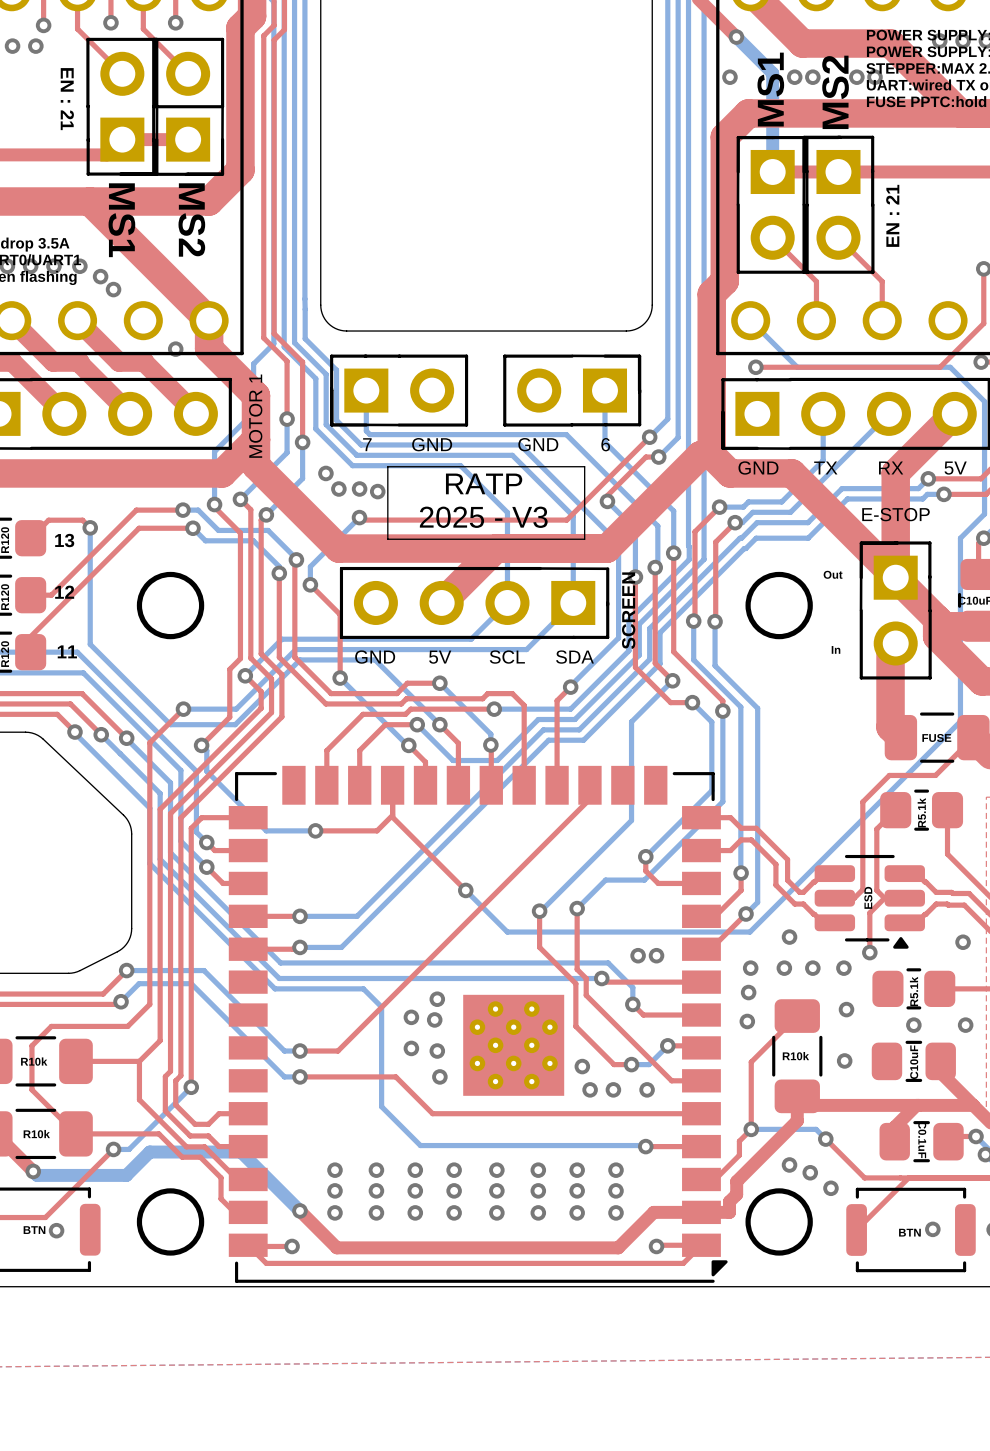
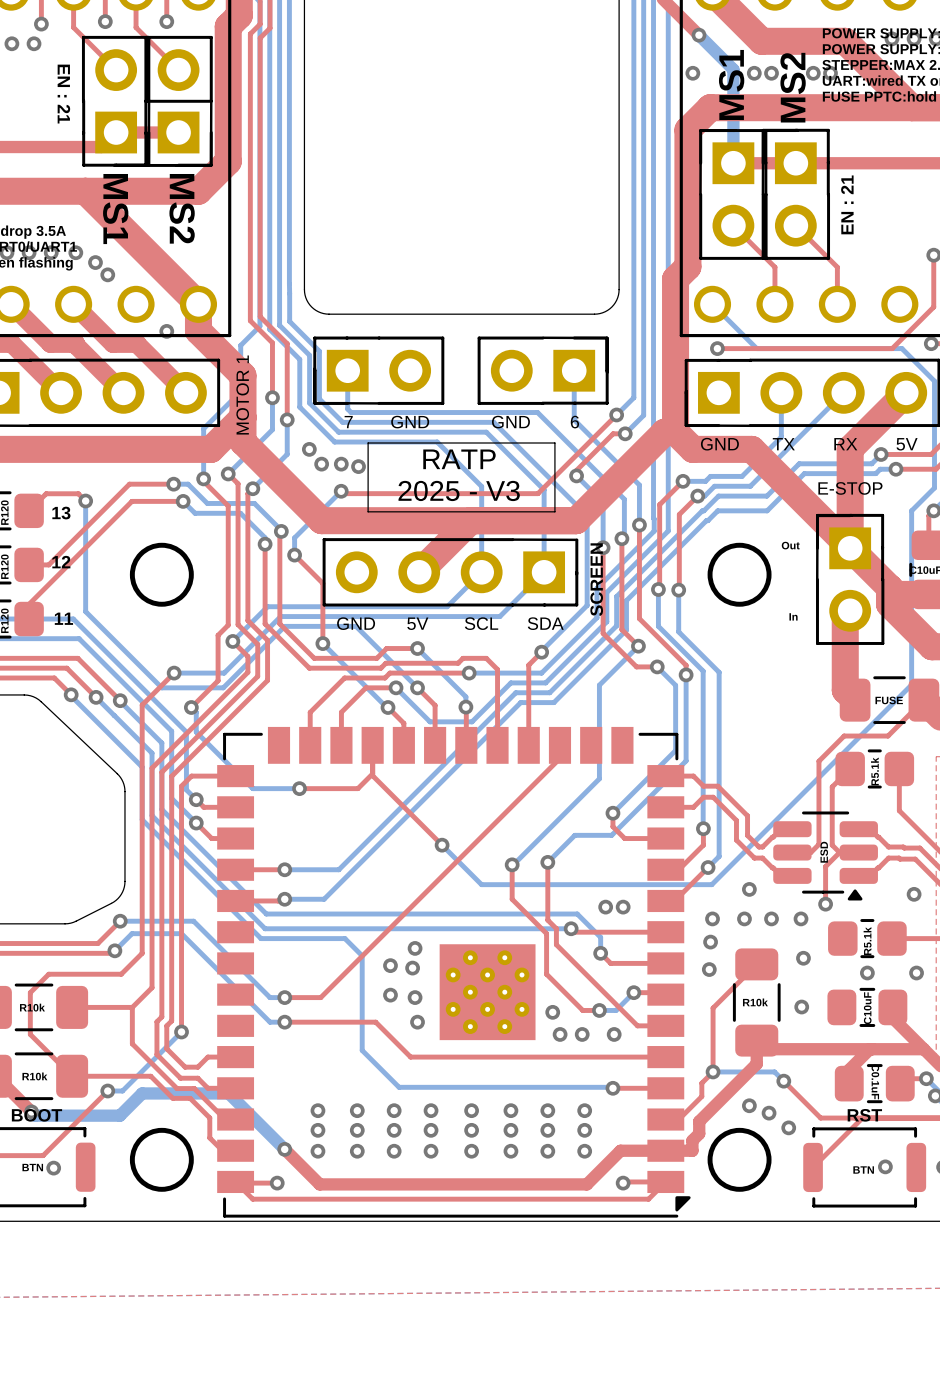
text: none -> BOOT (36, 1115)
text: none -> RST (864, 1115)

